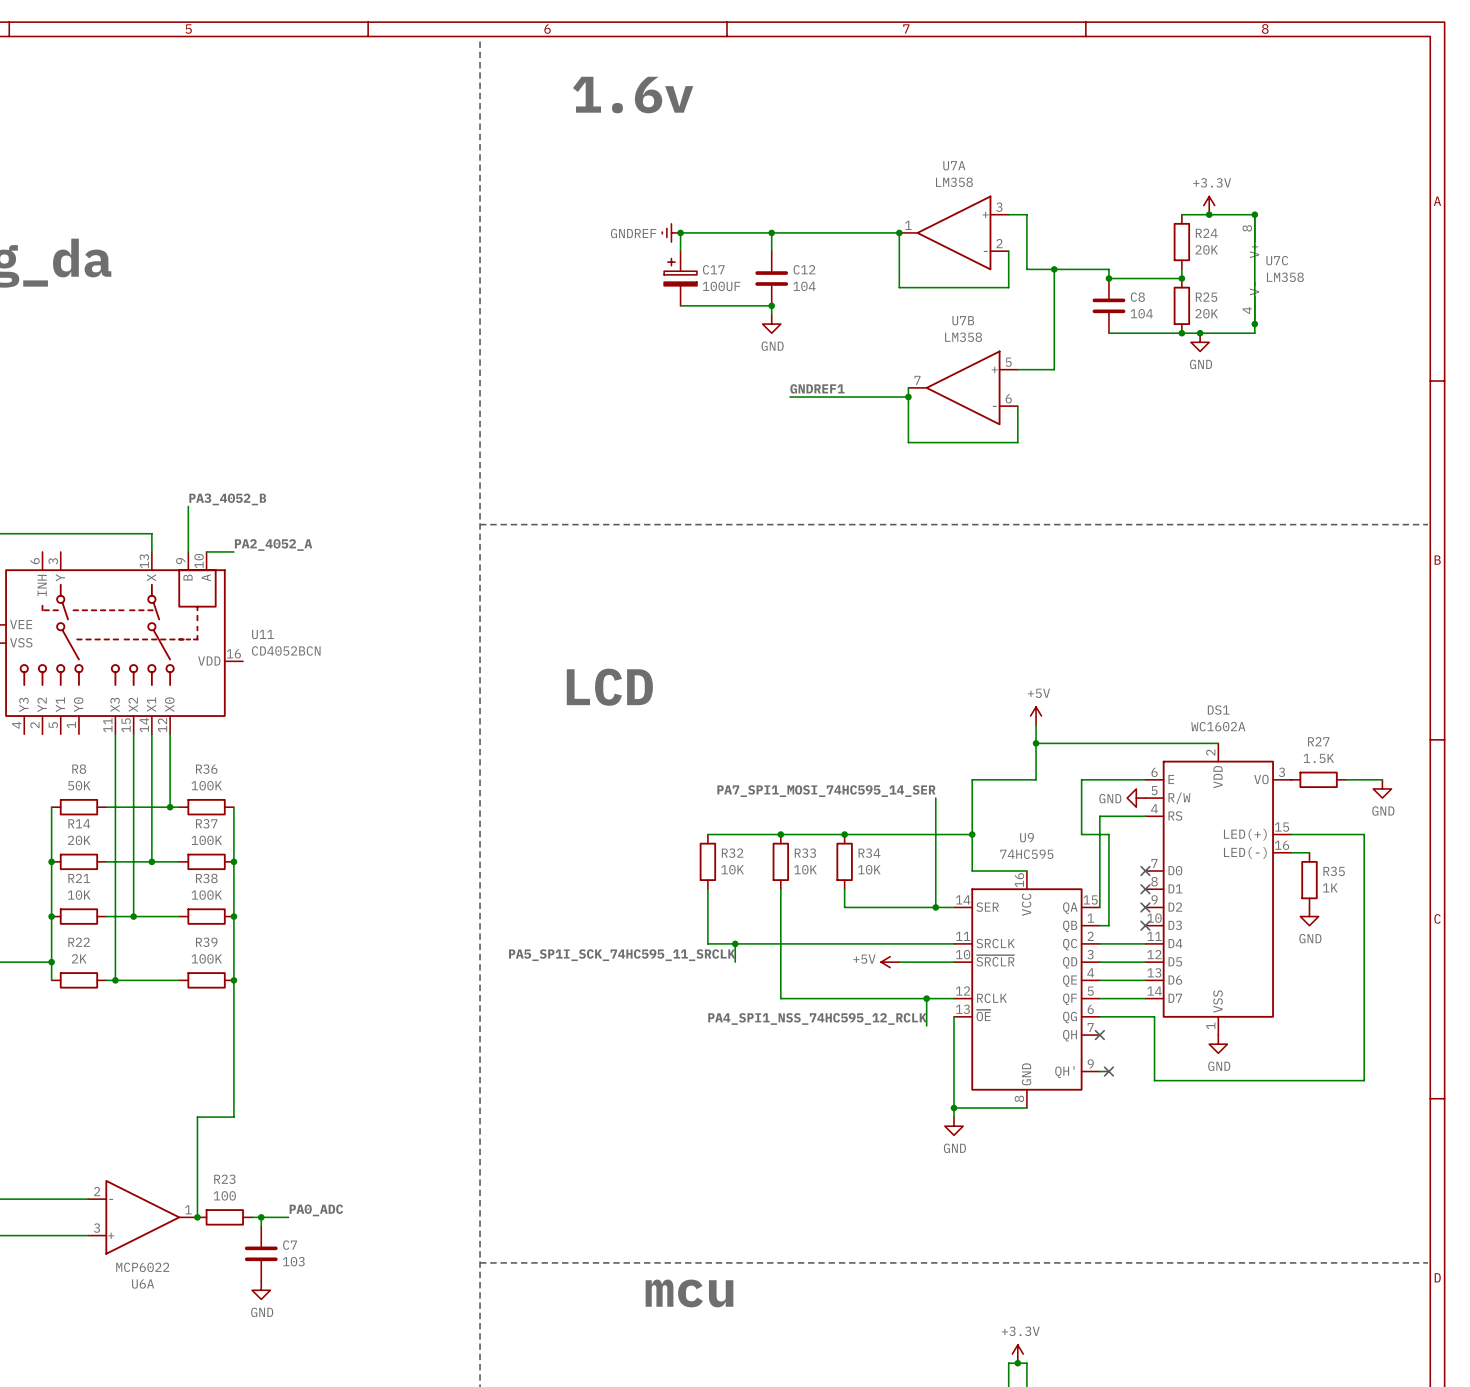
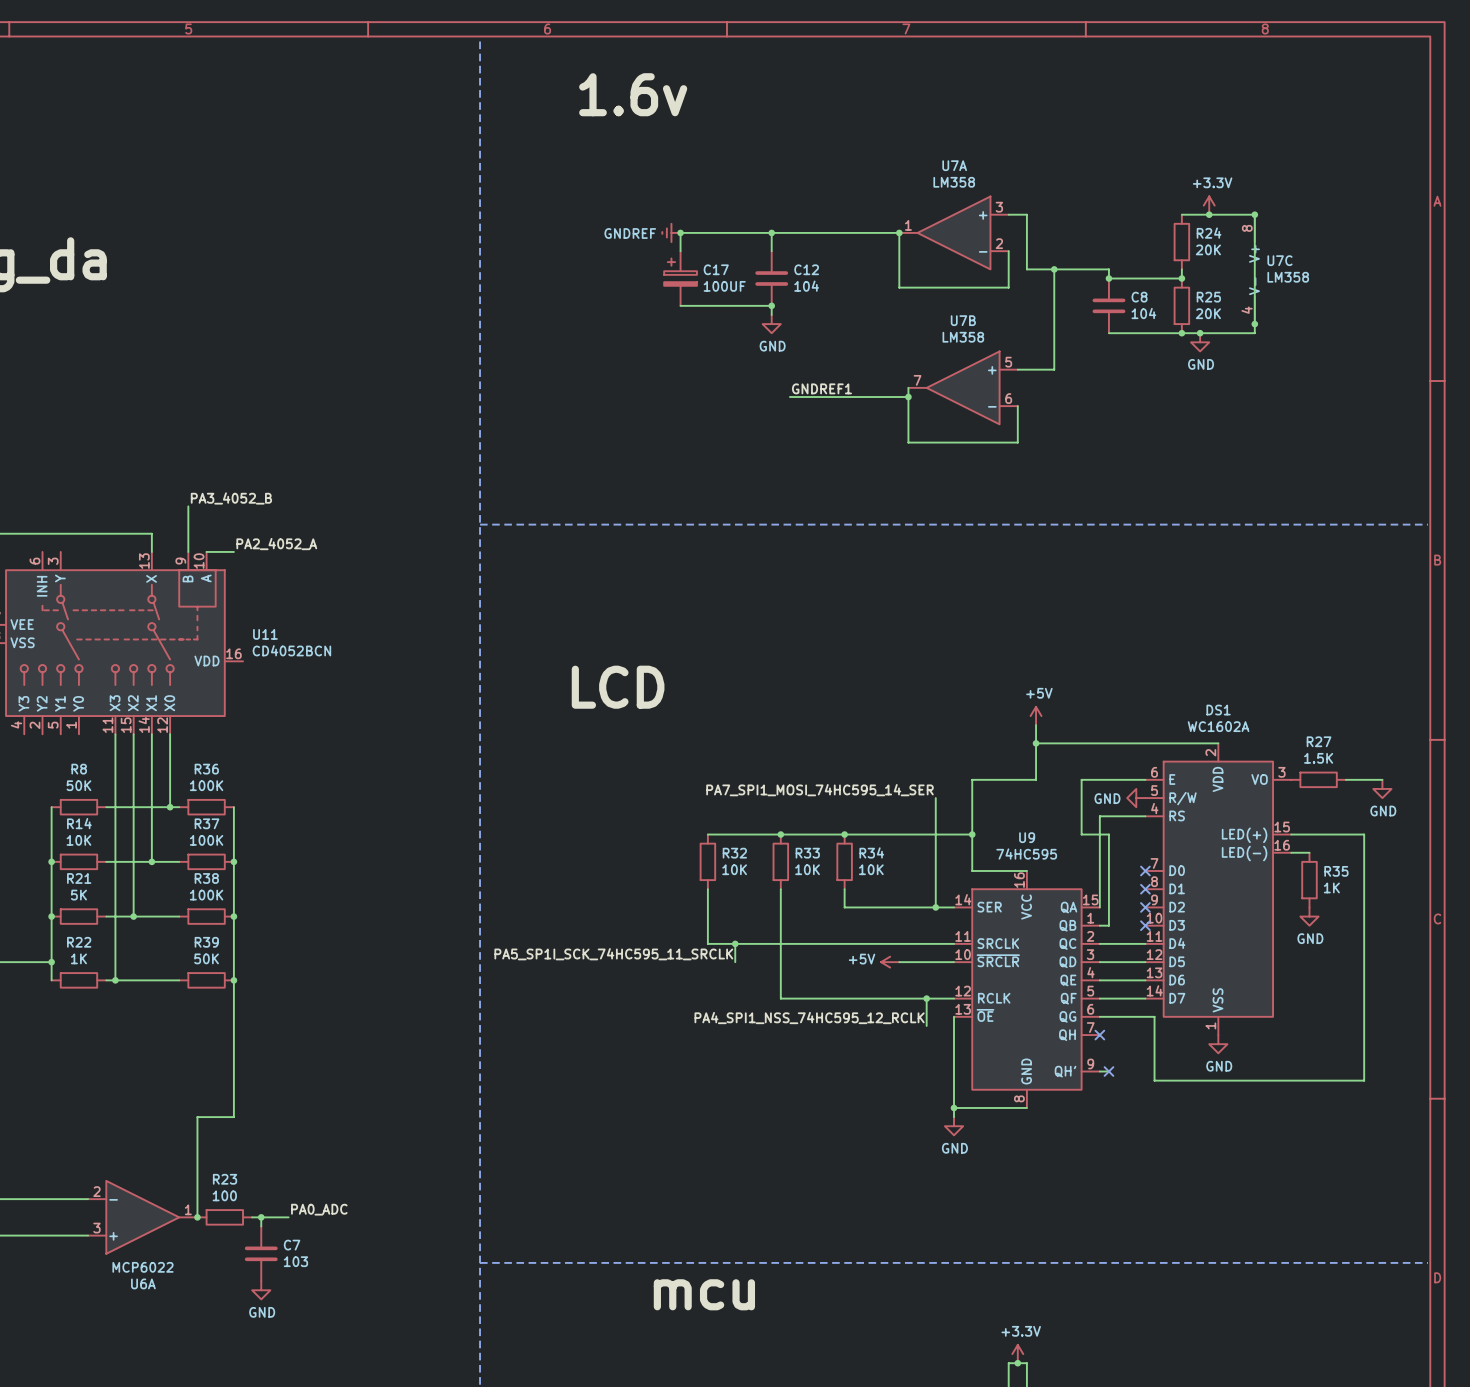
R14 value: 20K (79, 840) -> 10K (78, 840)
R21 value: 10K (79, 895) -> 5K (78, 895)
R22 value: 2K (79, 958) -> 1K (78, 958)
R39 value: 100K (206, 958) -> 50K (206, 958)

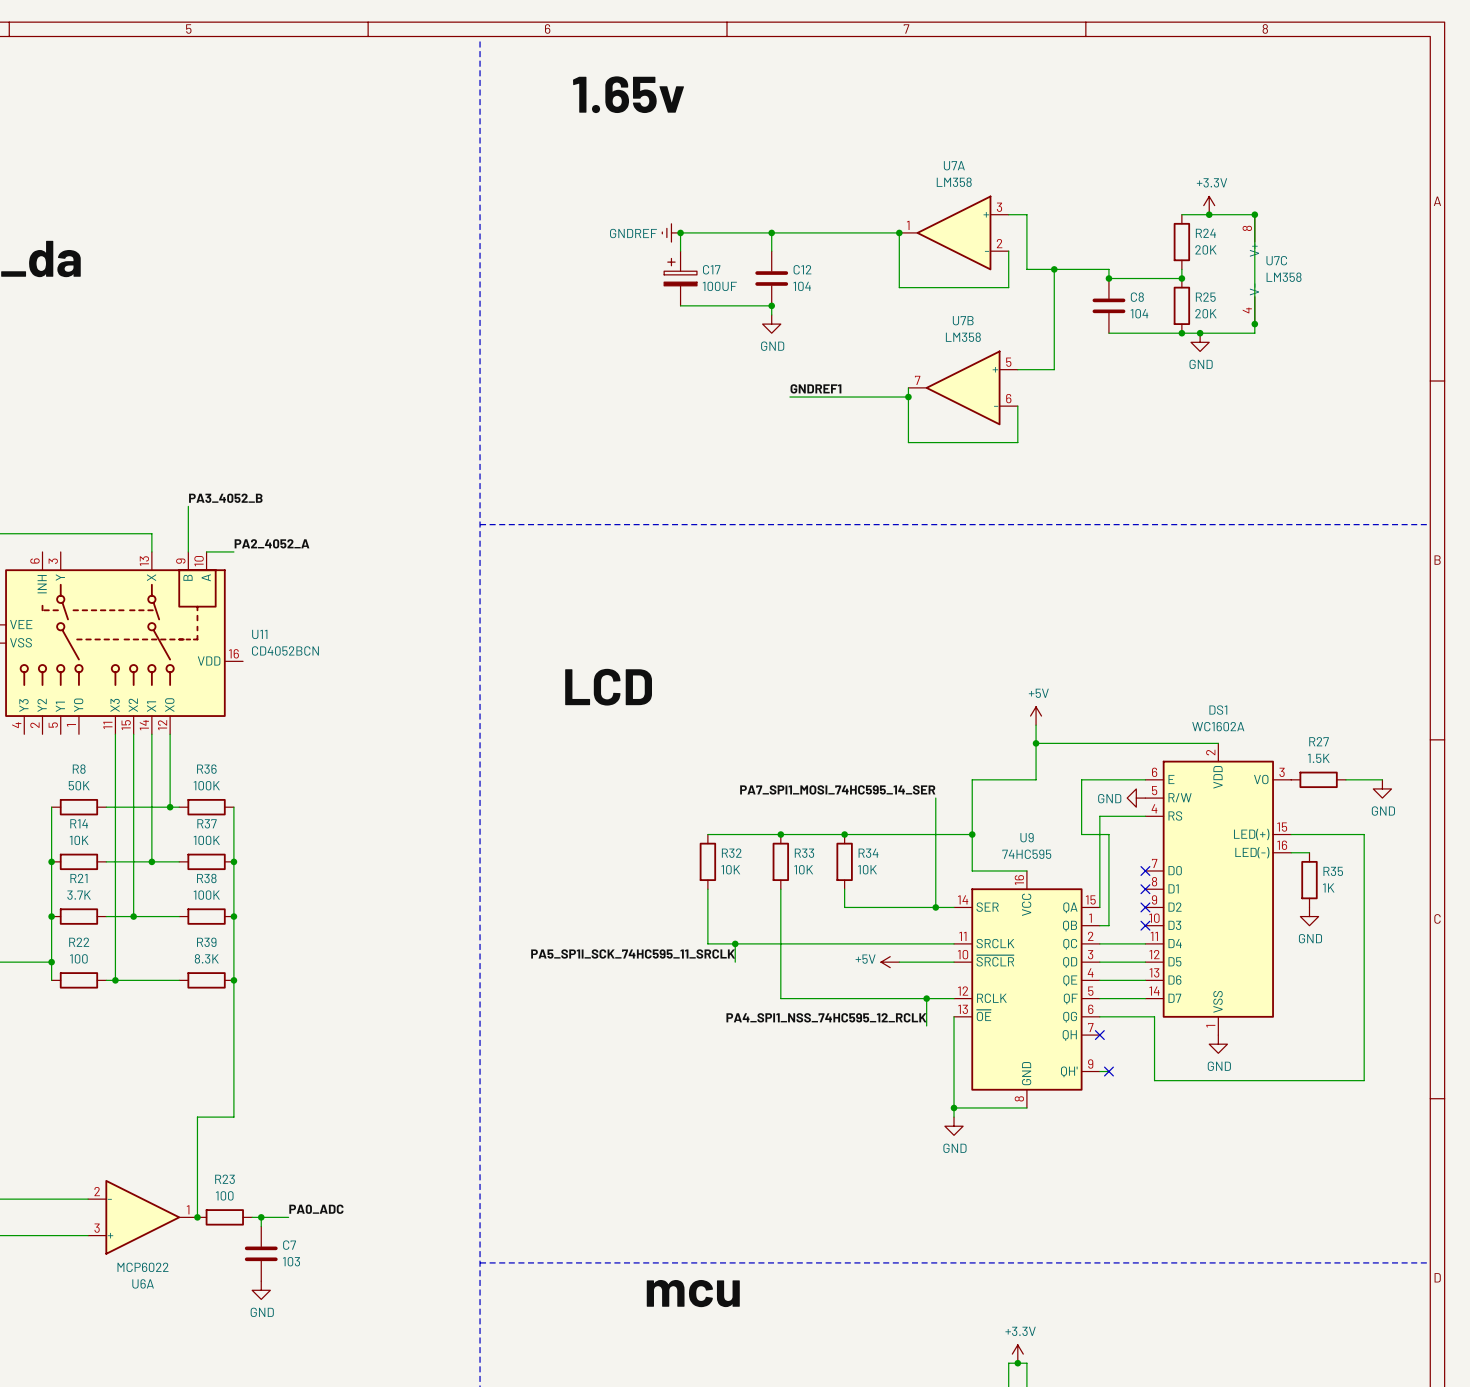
label: 1.6v (633, 94) -> 1.65v (628, 94)
R21 value: 5K (78, 895) -> 3.7K (79, 895)
R22 value: 1K (78, 958) -> 100 (78, 958)
R39 value: 50K (206, 958) -> 8.3K (206, 958)

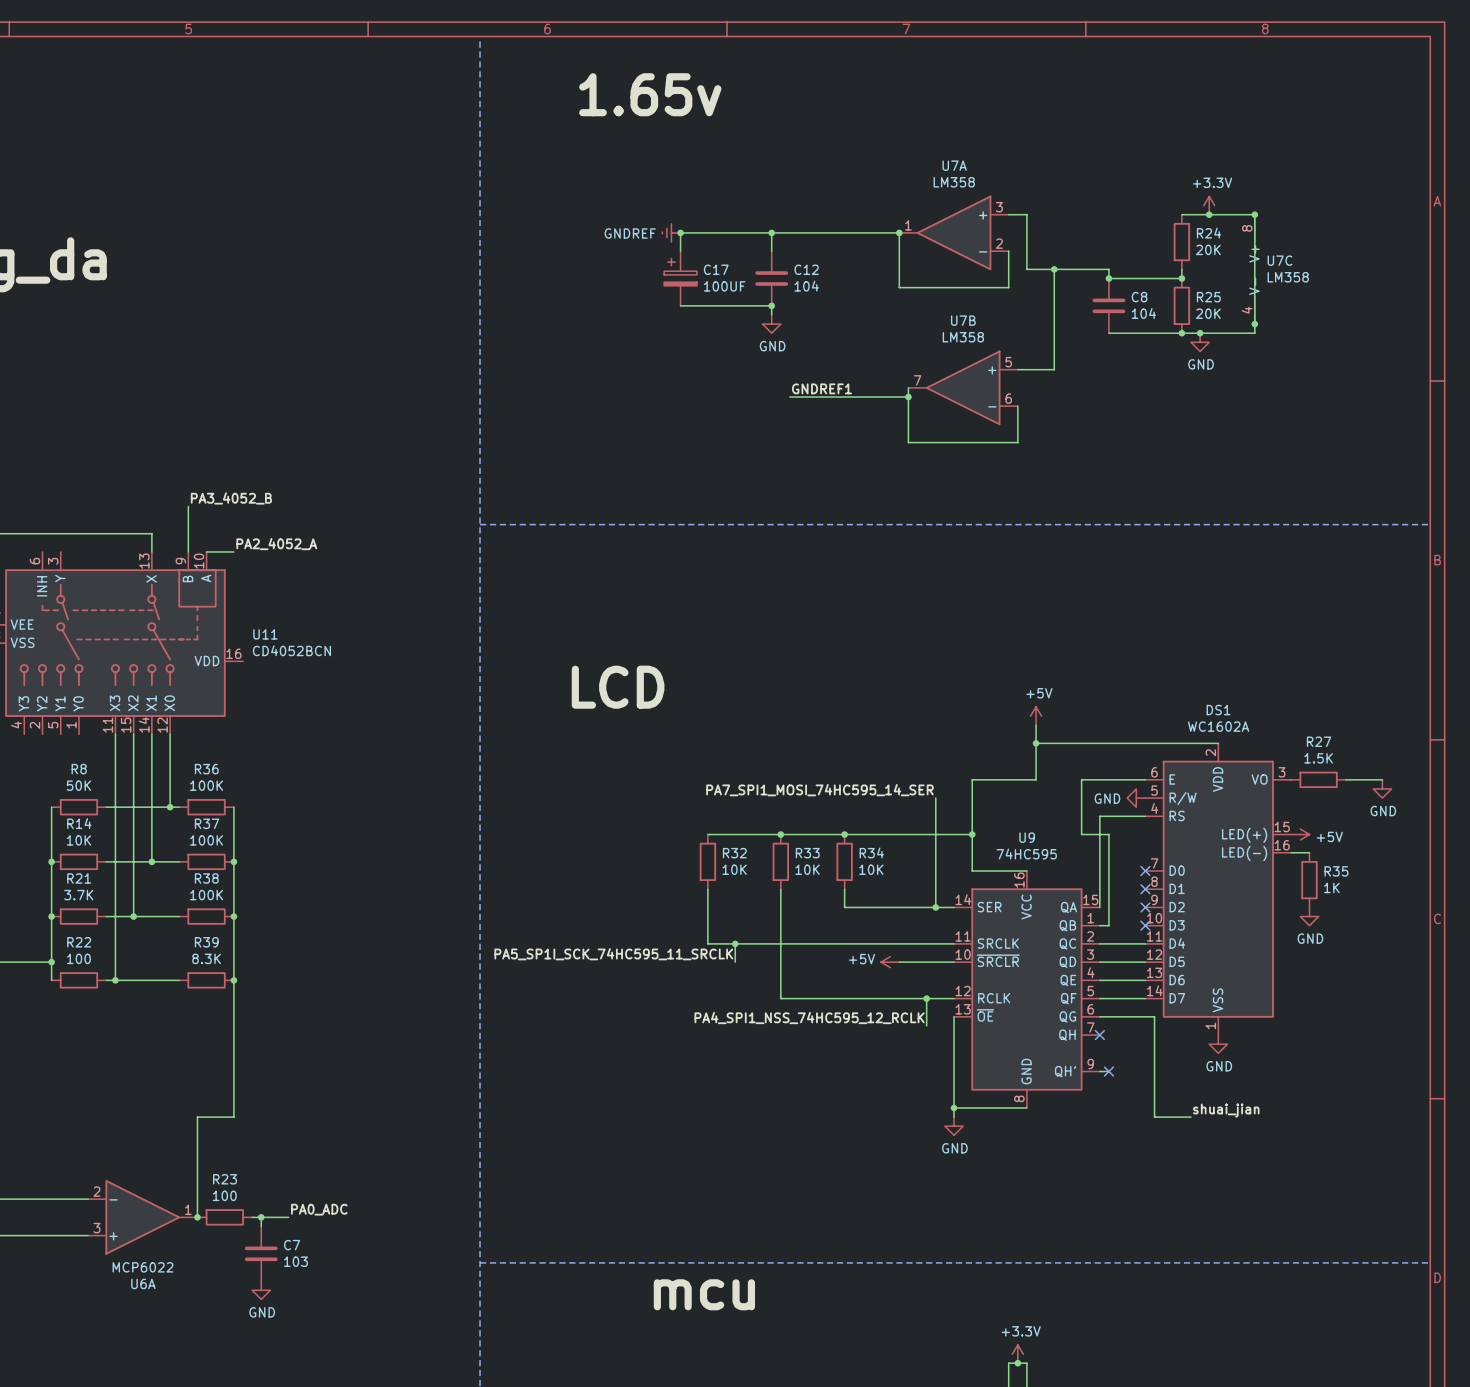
wire: (1291, 834) (1364, 834) (1364, 1080) (1154, 1080) -> (1191, 1117) (1154, 1117) (1154, 1080)
power symbol: none -> +5V (1300, 834)
label: none -> shuai_jian (1226, 1110)

